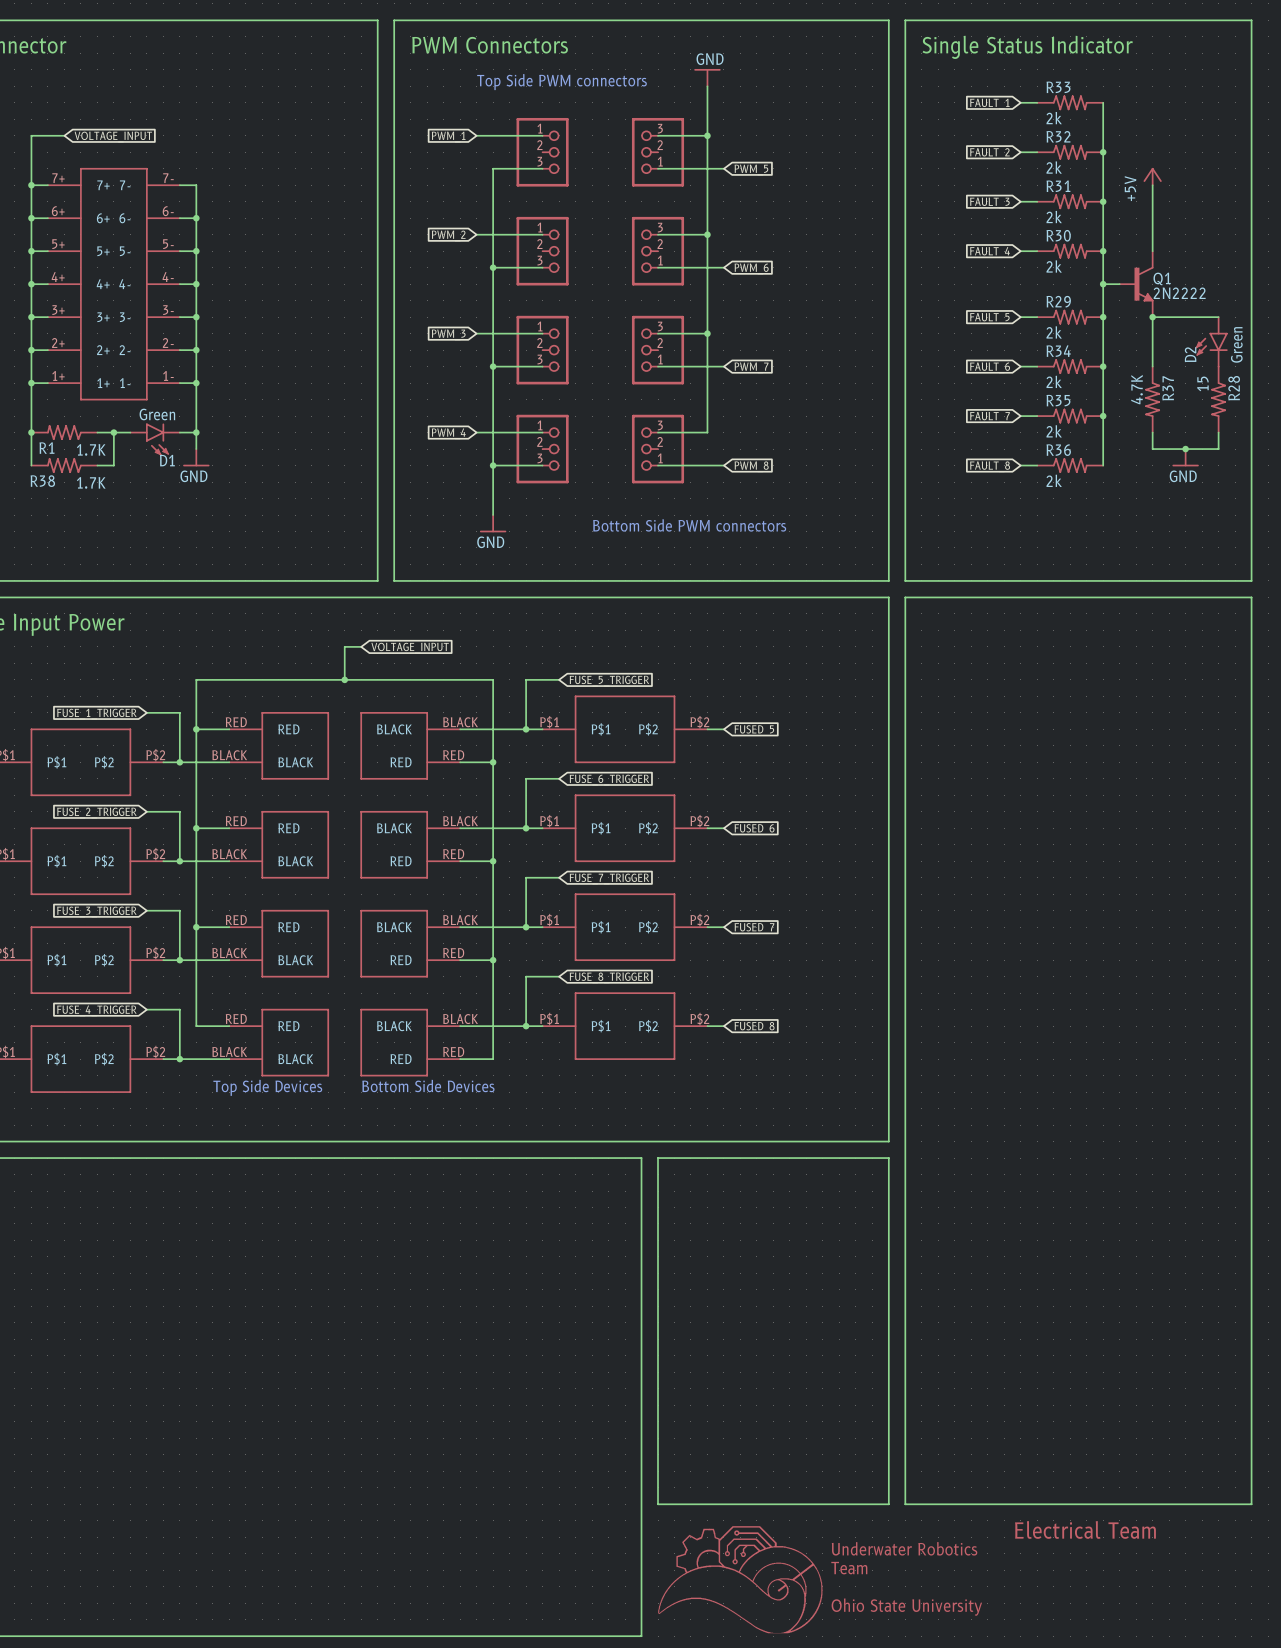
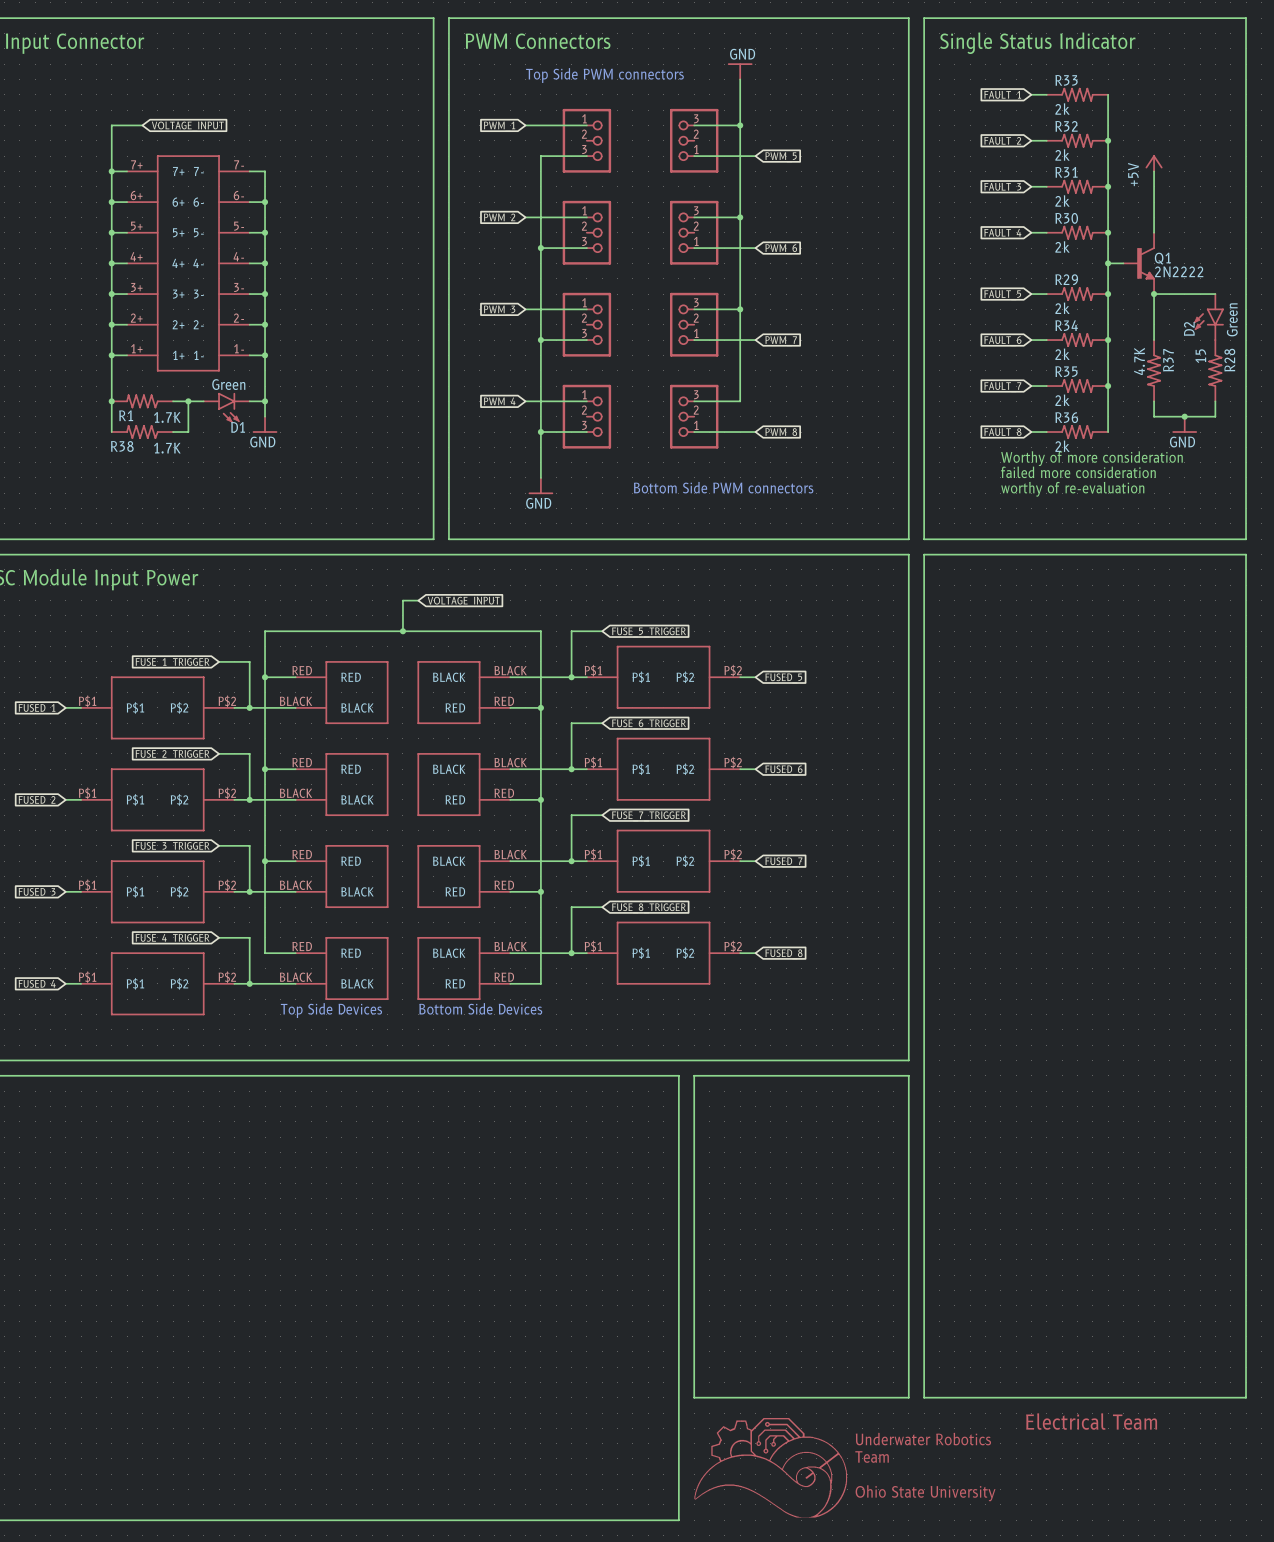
text: none -> Worthy of more consideration (1091, 458)
text: none -> failed more consideration (1078, 472)
text: none -> worthy of re-evaluation (1072, 489)

